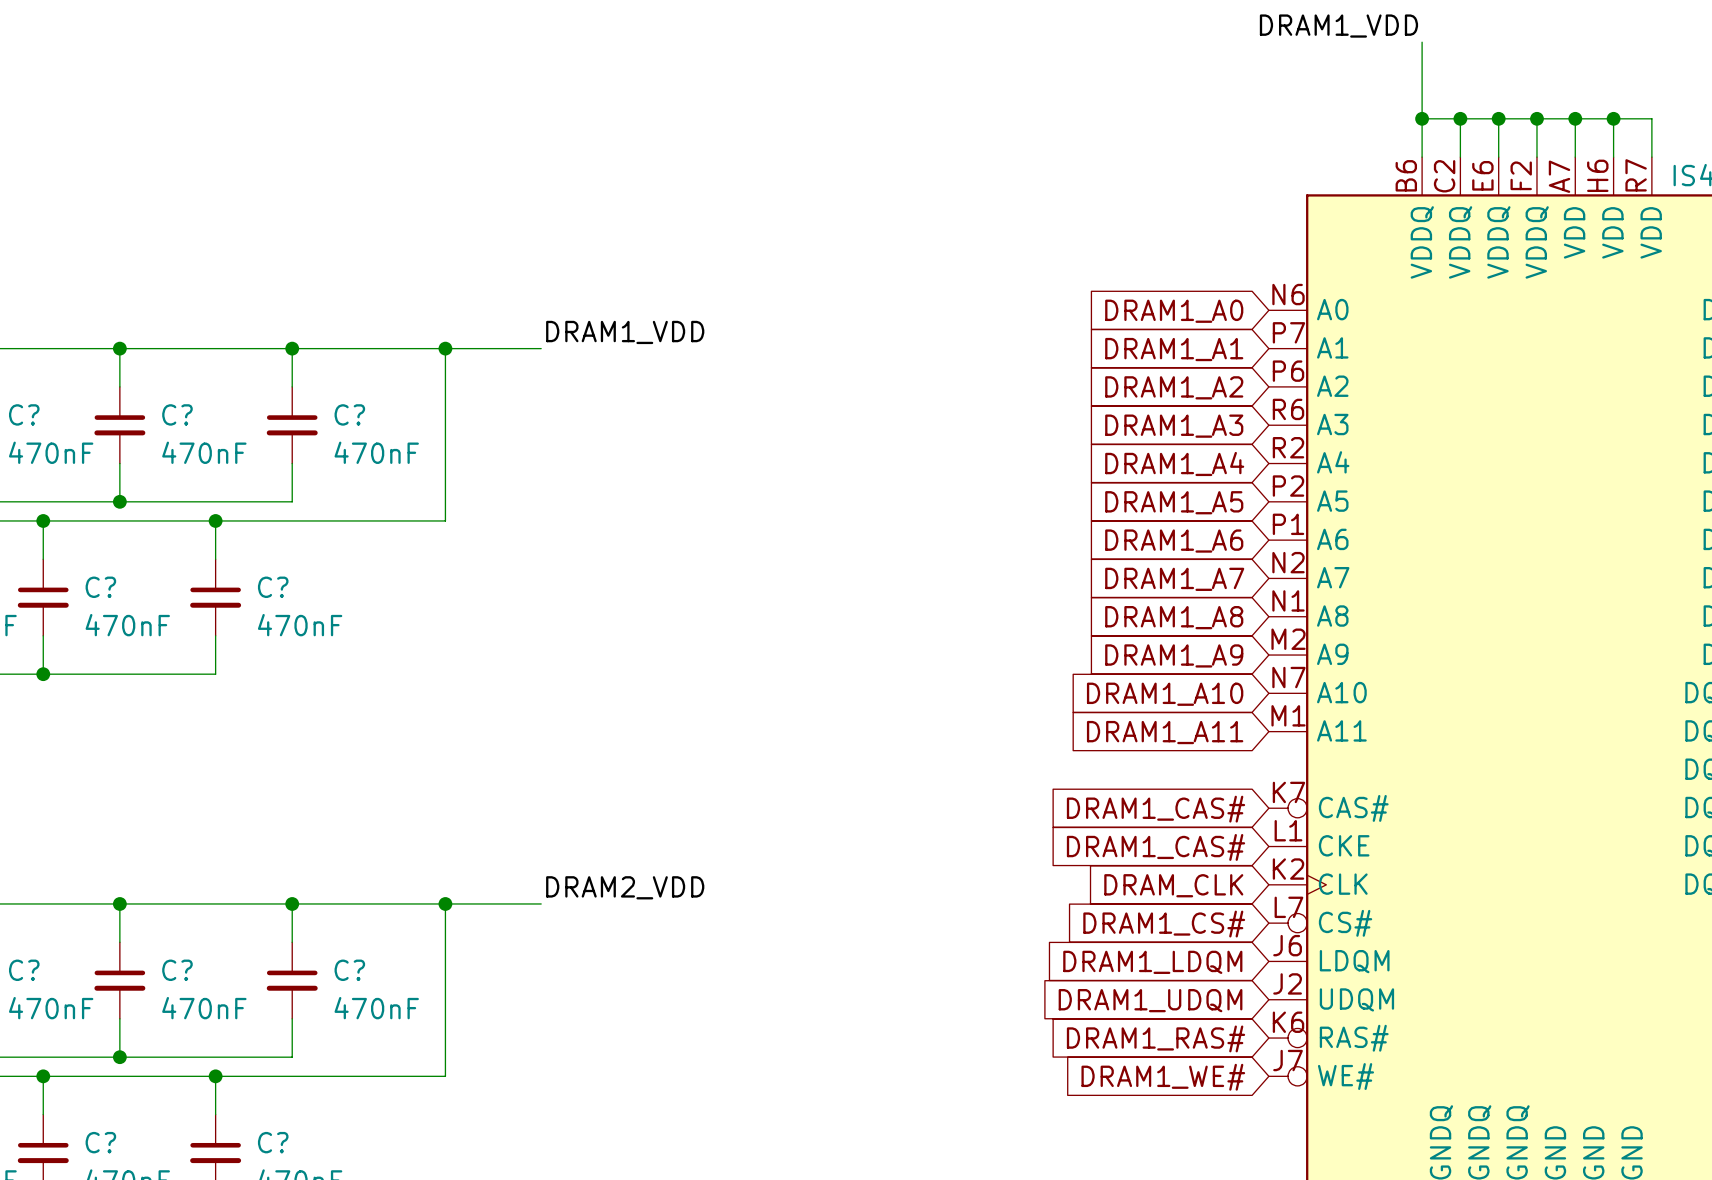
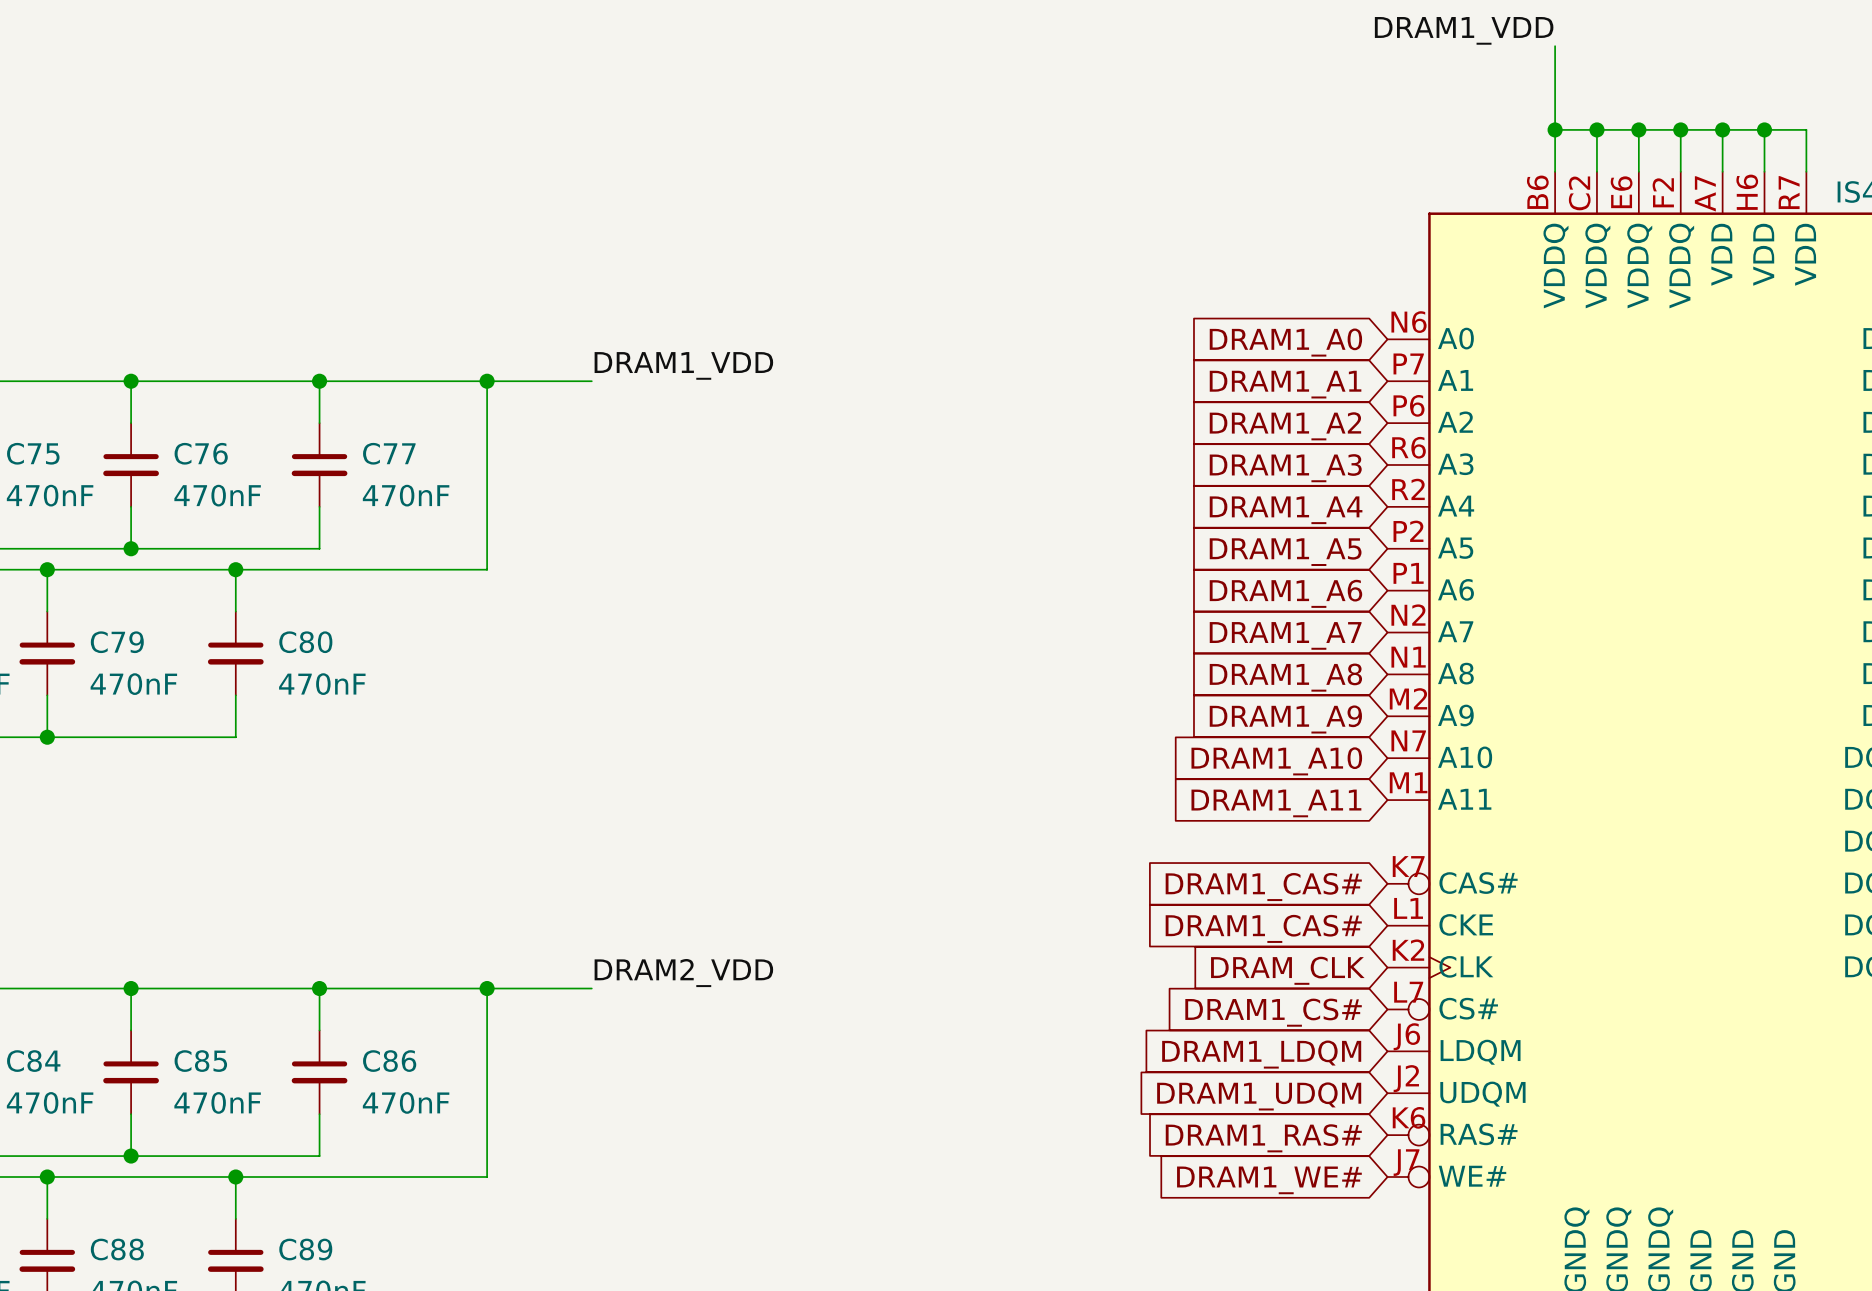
C? name: C? (24, 414) -> C75 (33, 453)
C? name: C? (177, 414) -> C76 (201, 453)
C? name: C? (349, 414) -> C77 (389, 453)
C? name: C? (100, 587) -> C79 (117, 642)
C? name: C? (273, 587) -> C80 (305, 642)
C? name: C? (24, 970) -> C84 (33, 1061)
C? name: C? (177, 970) -> C85 (200, 1061)
C? name: C? (349, 970) -> C86 (389, 1061)
C? name: C? (100, 1142) -> C88 (117, 1249)
C? name: C? (273, 1142) -> C89 (305, 1249)

